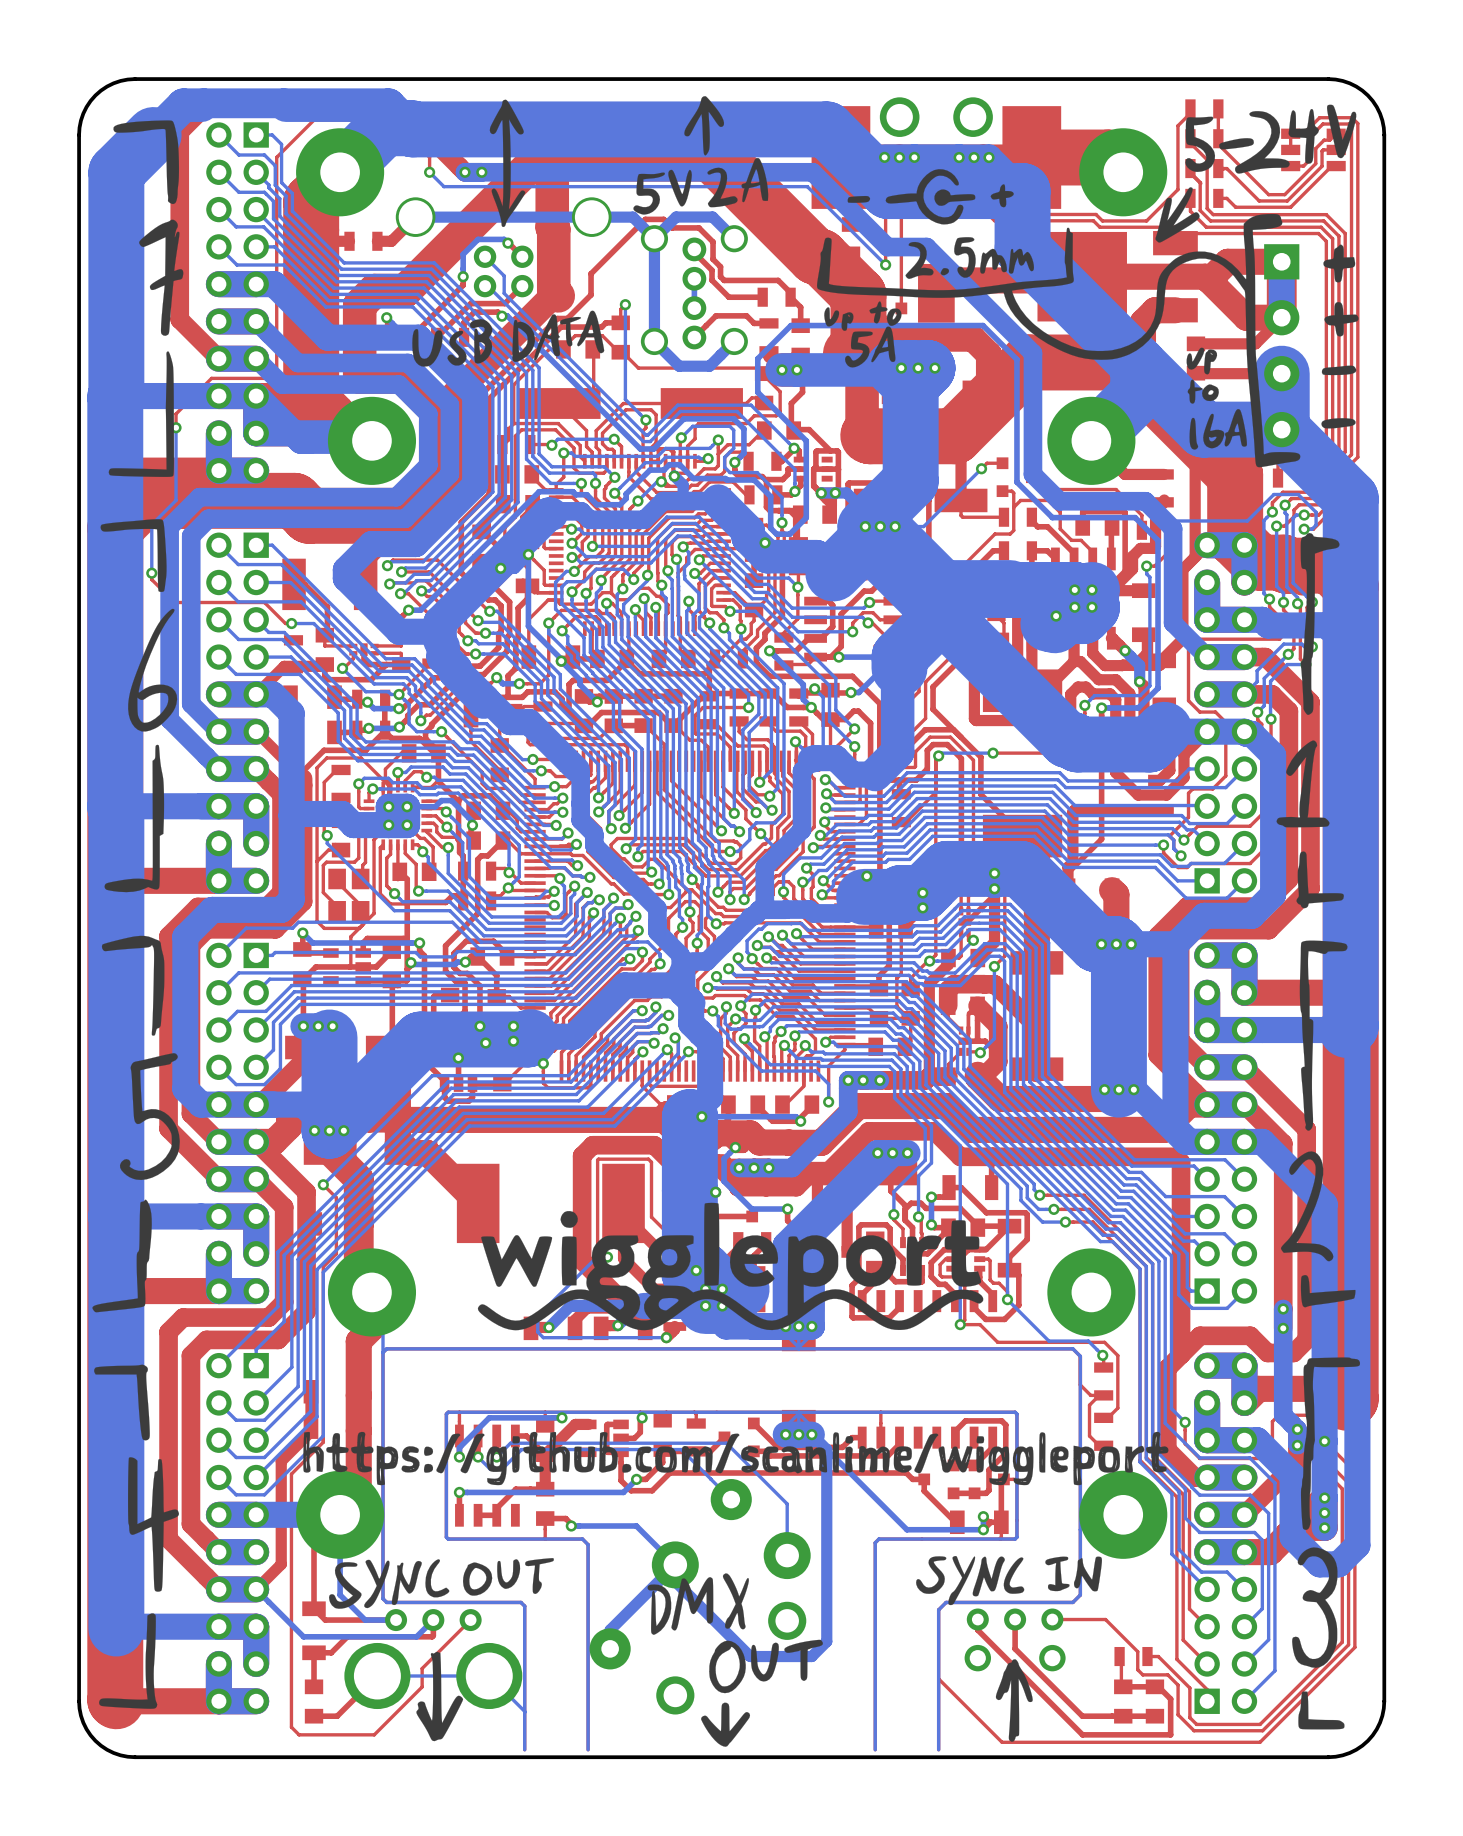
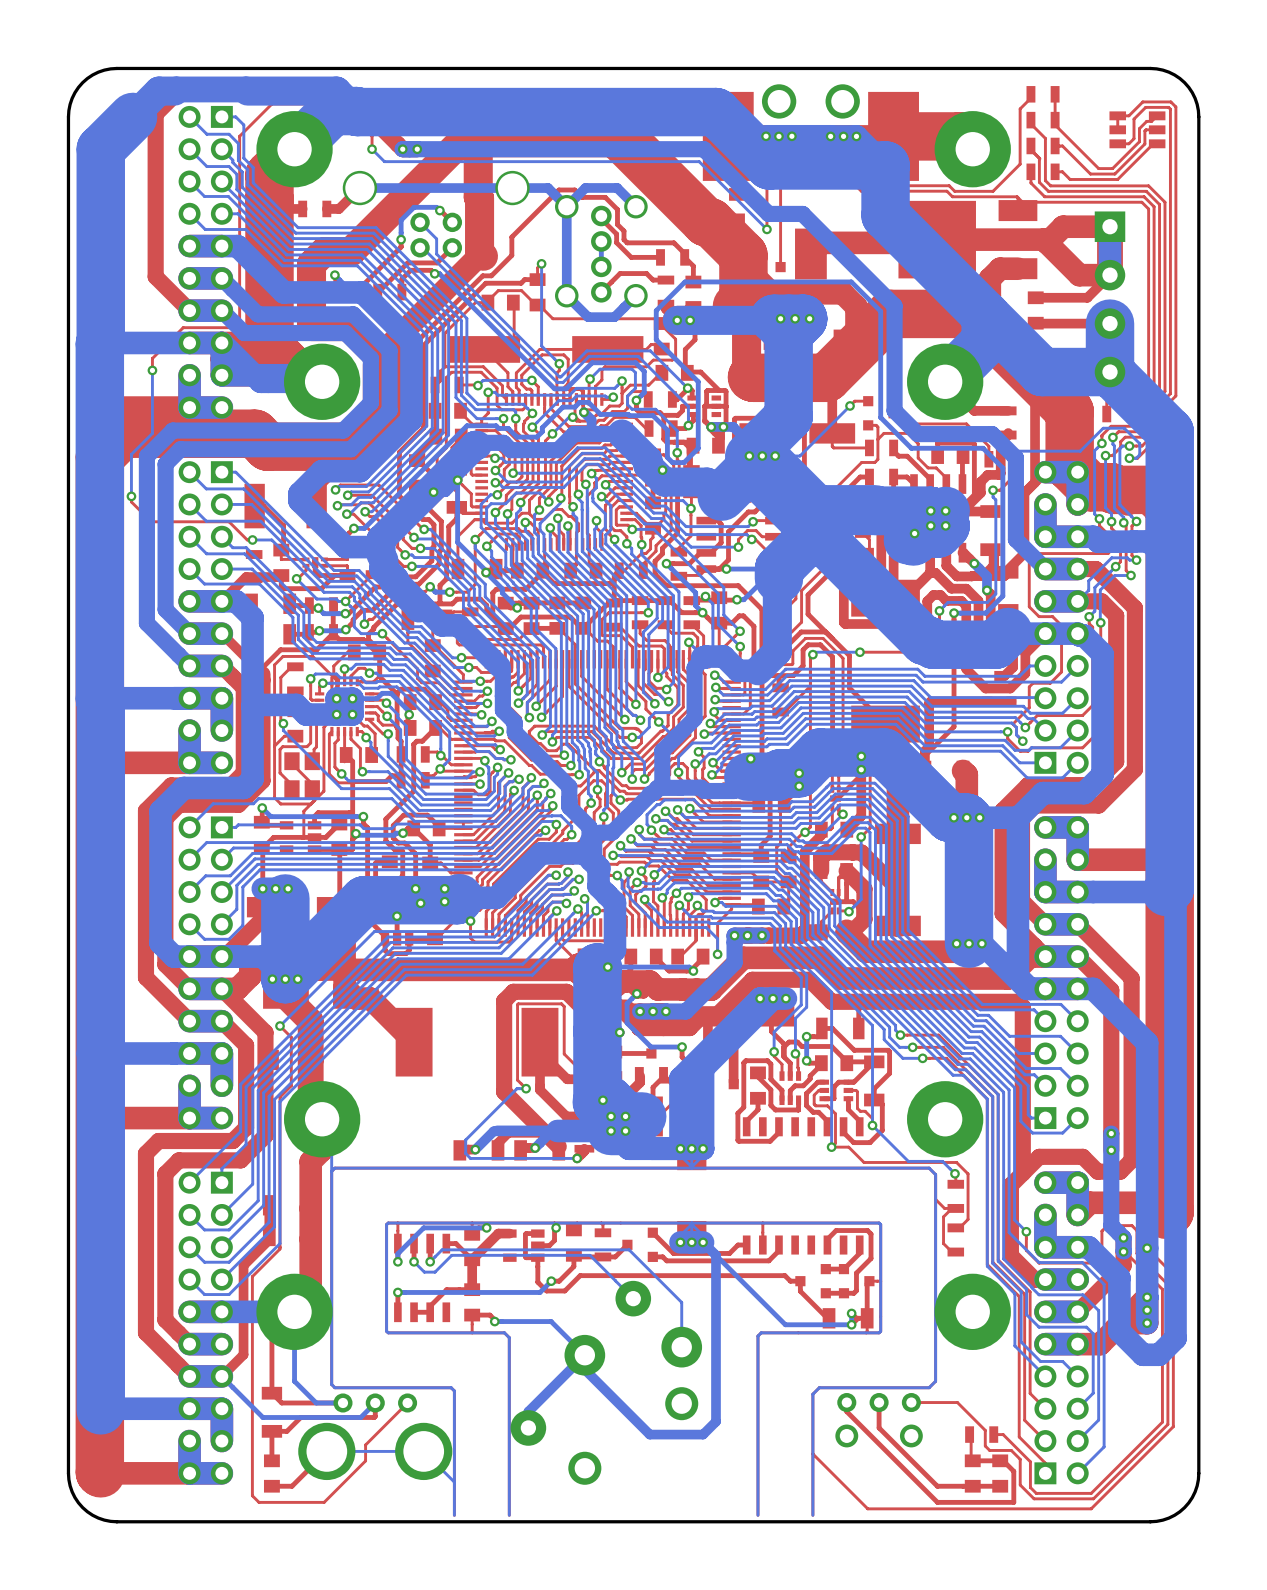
drawing: [92, 96, 1361, 1747] -> none

